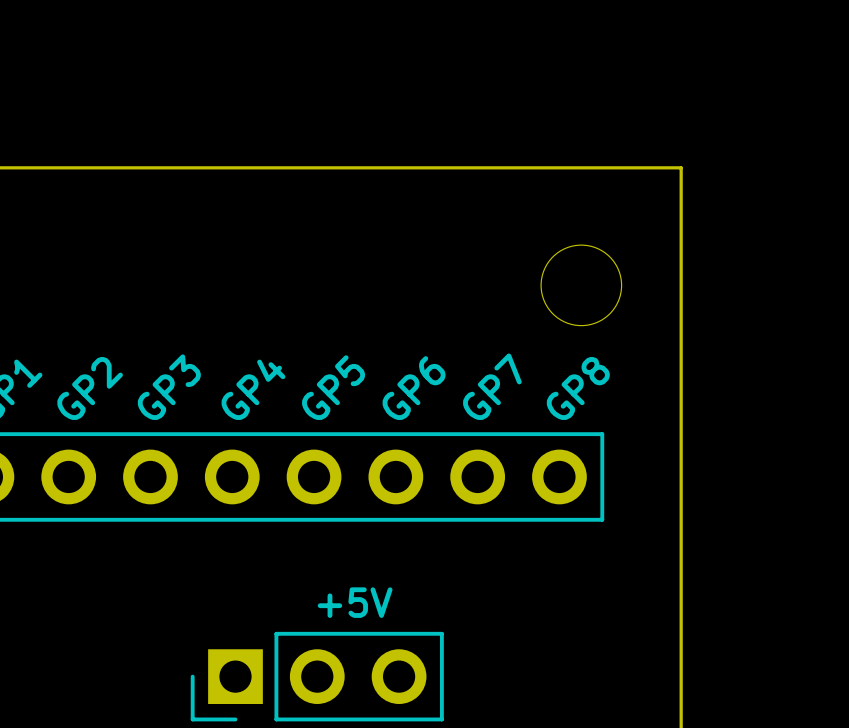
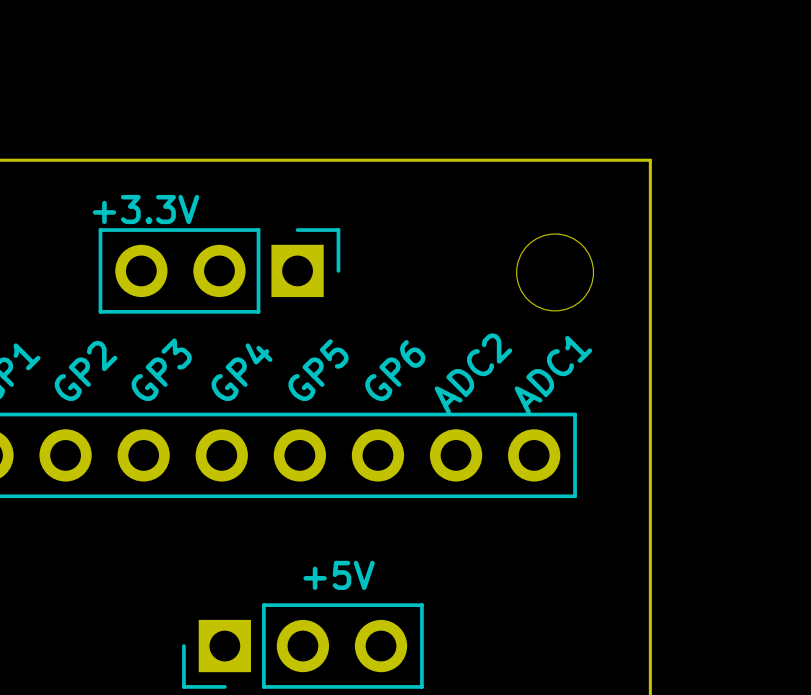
text: none -> +3.3V (146, 209)
part: none -> (219, 270)
text: GP7 (492, 386) -> ADC2 (473, 373)
text: GP8 (578, 388) -> ADC1 (553, 375)

